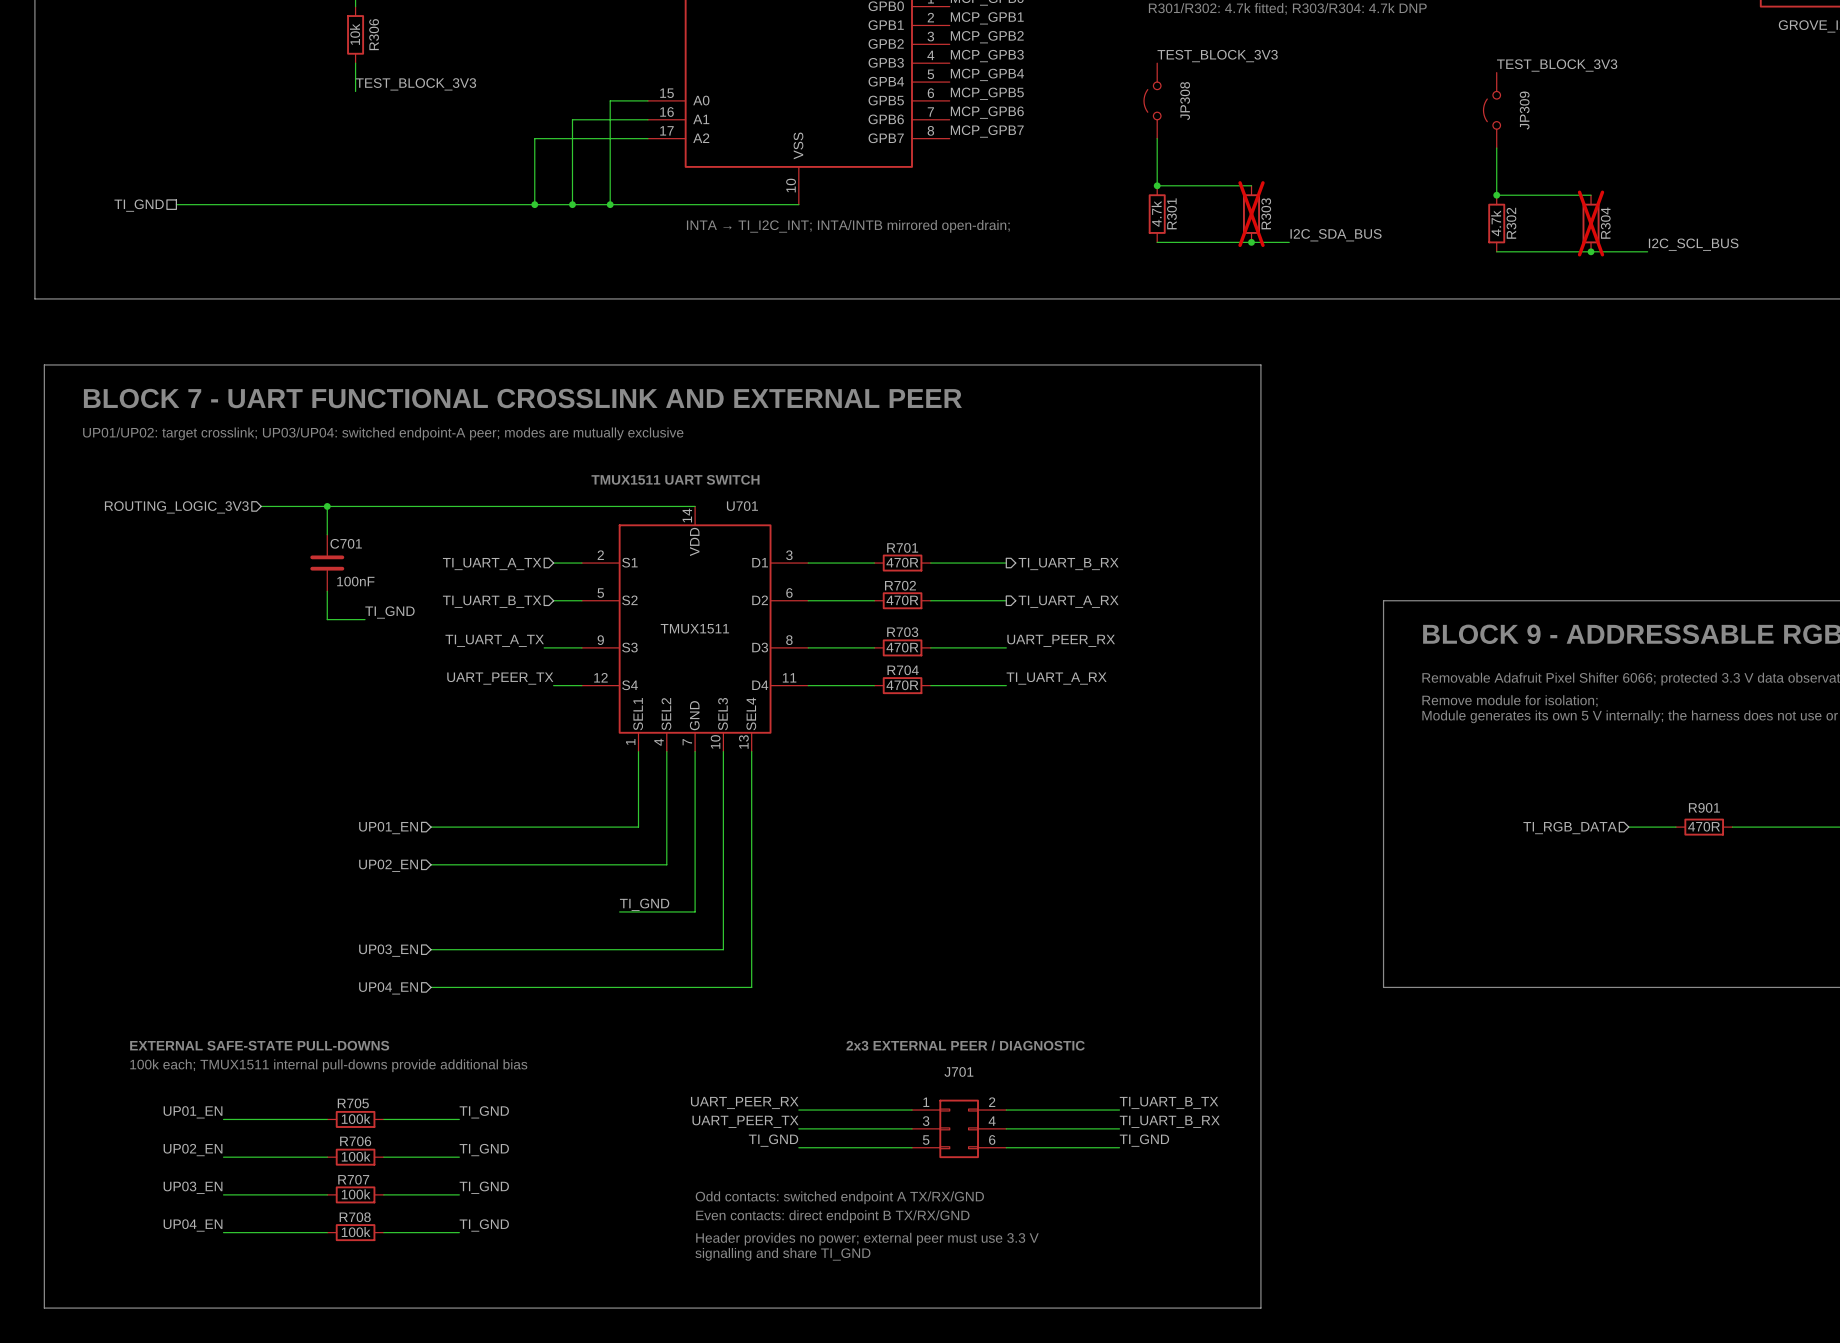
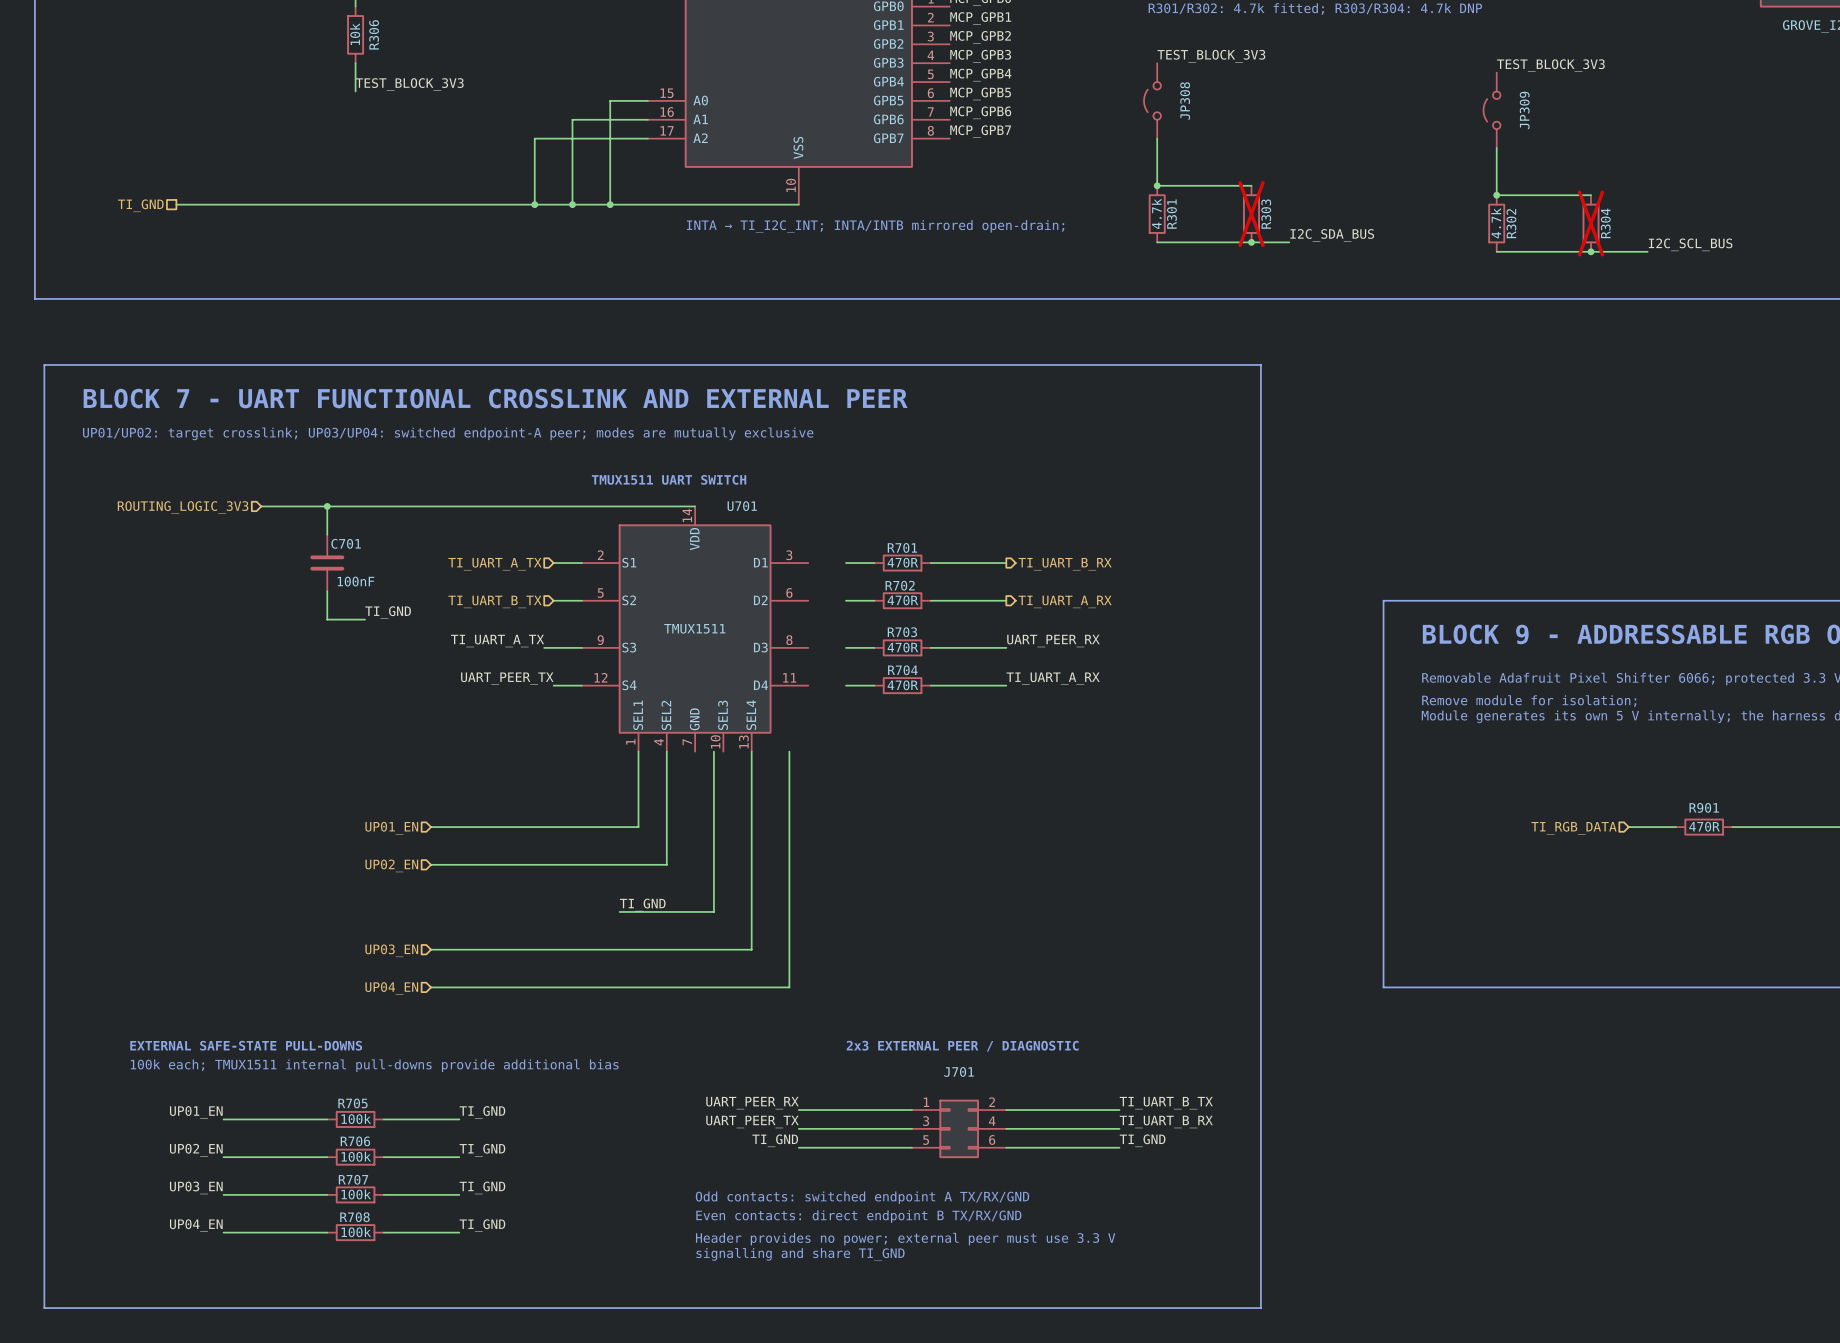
wire: (808, 563) (845, 563) -> none
wire: (808, 600) (845, 600) -> none
wire: (808, 647) (845, 647) -> none
wire: (808, 685) (845, 685) -> none
wire: (695, 751) (695, 911) -> (713, 751) (713, 911) (695, 911)
wire: (723, 751) (723, 949) -> none
wire: none -> (789, 751) (789, 987) (751, 987)
wire: (751, 949) (751, 987) -> (751, 949) (723, 949)

